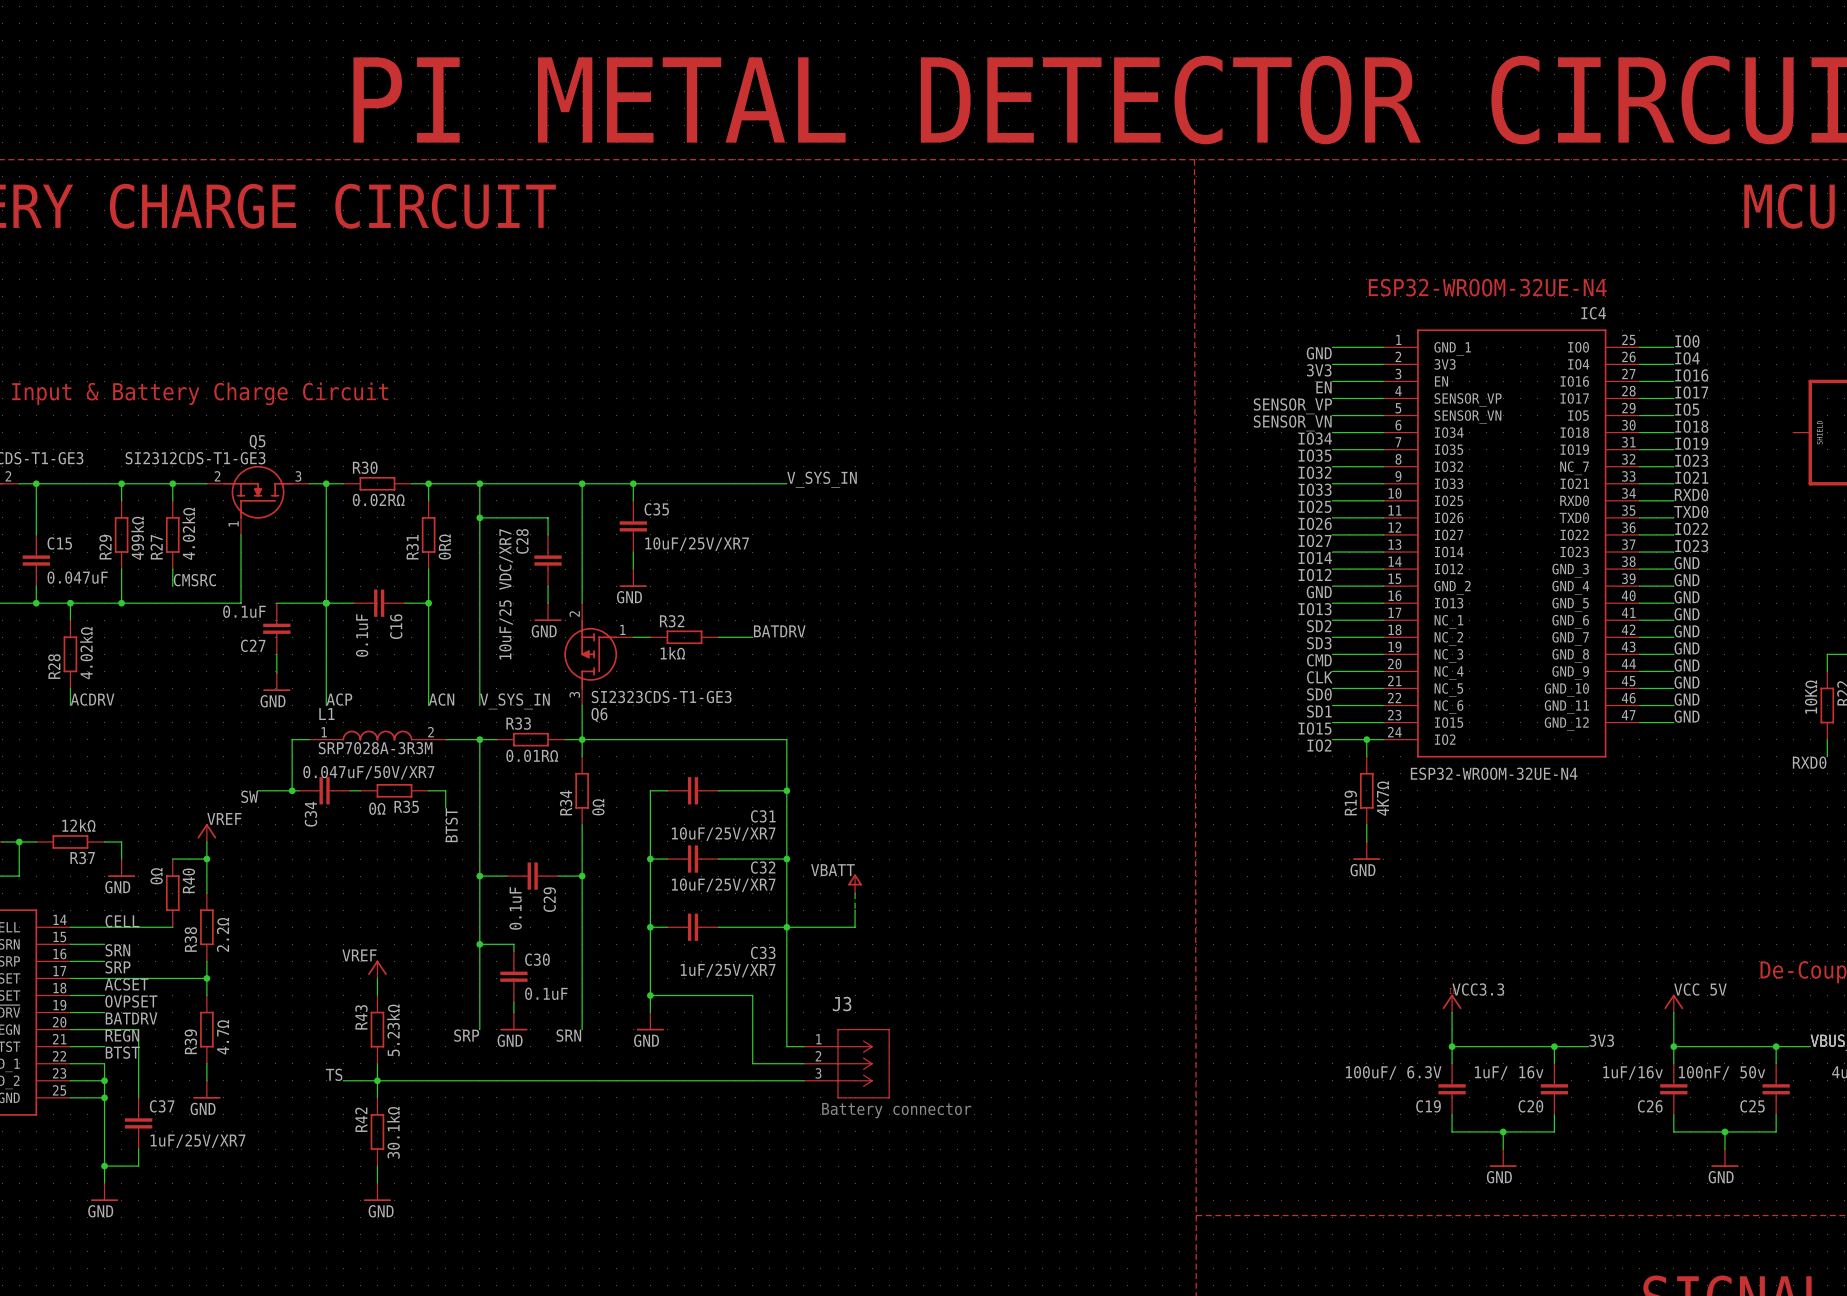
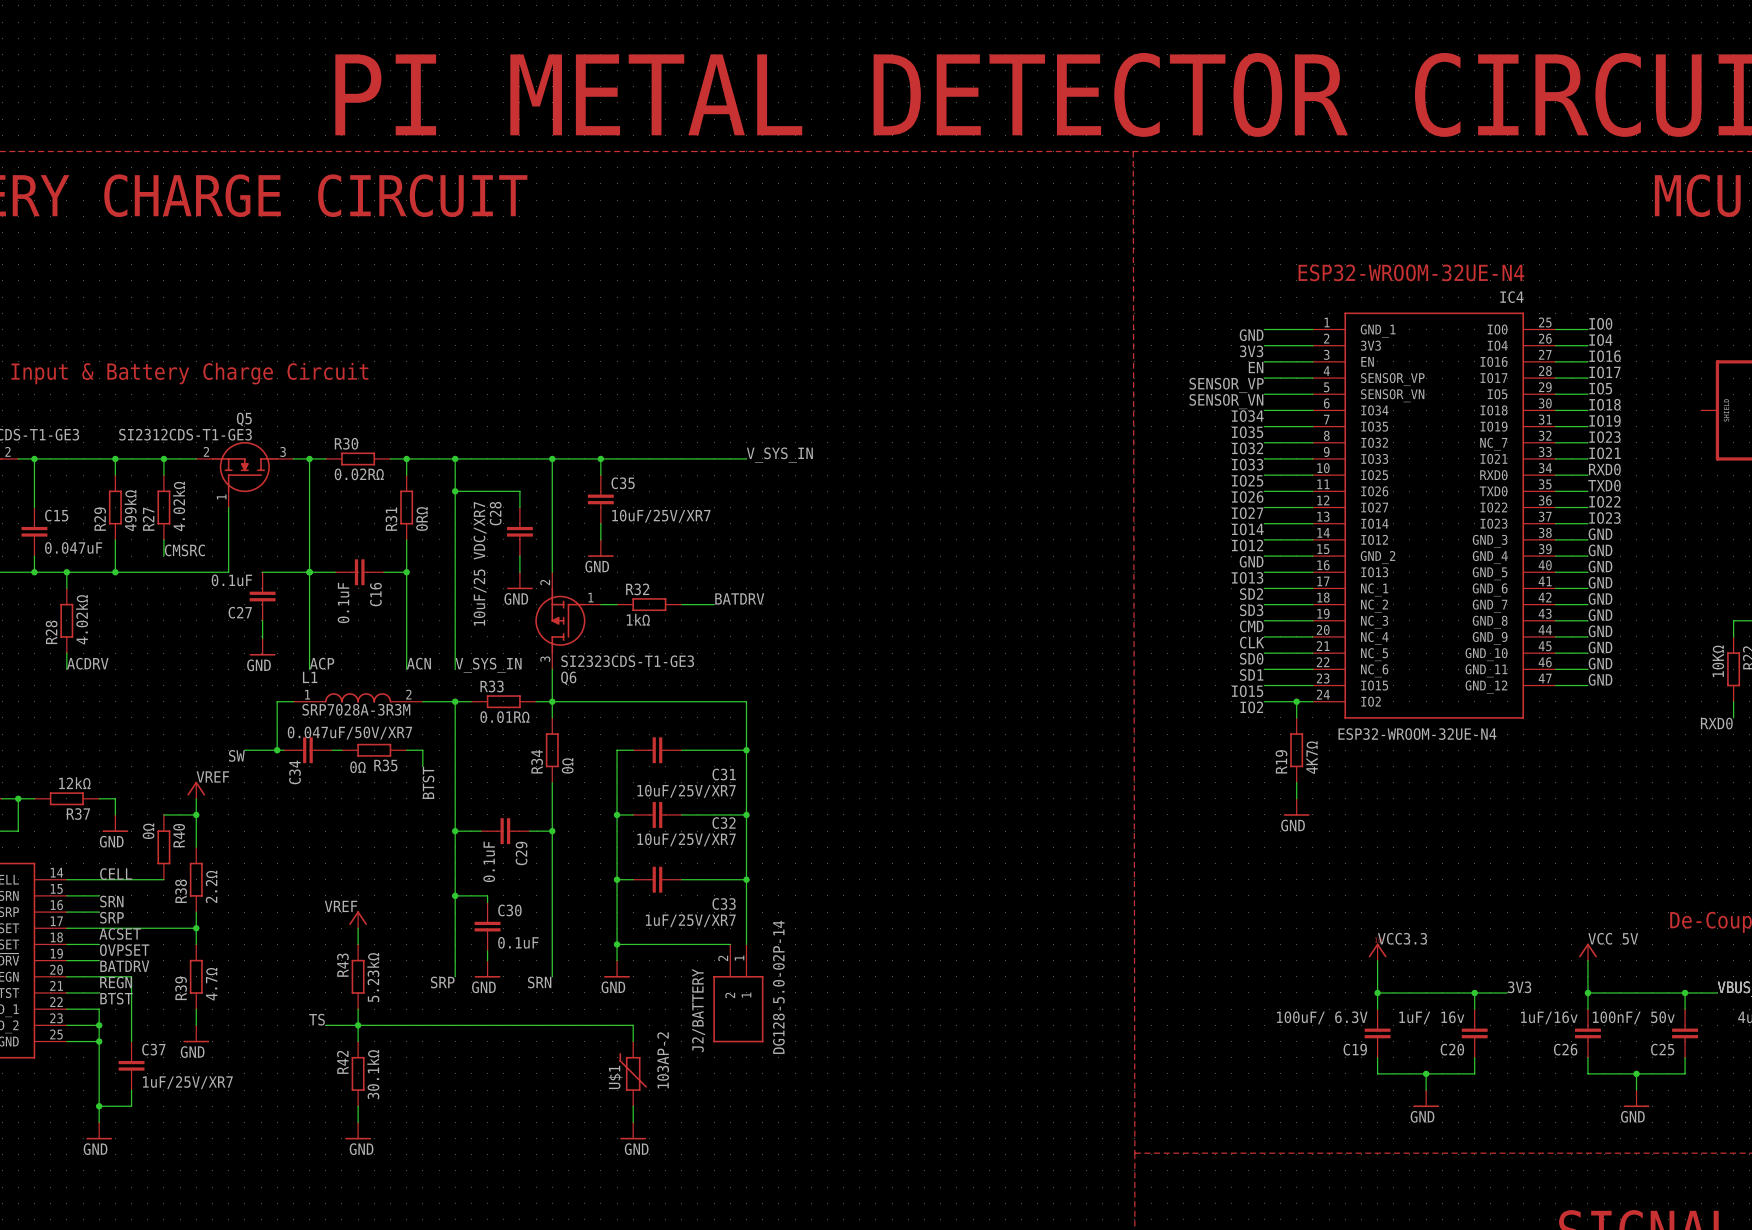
label: VBATT (832, 870) -> none
power symbol: (855, 883) -> none
wire: (855, 893) (855, 927) (786, 927) -> none
wire: (752, 995) (752, 1063) (803, 1063) -> (714, 944) (730, 944)
wire: (786, 995) (786, 1046) (803, 1046) -> none
J2/BATTERY: none -> DG128-5.0-02P-14 (738, 993)
J3: (846, 1063) -> none
wire: (667, 1080) (803, 1080) -> (633, 1025) (633, 1041)
text: Battery connector (896, 1110) -> none
U$1: none -> 103AP-2 (633, 1073)
wire: none -> (633, 1106) (633, 1122)
power symbol: none -> GND (633, 1130)

